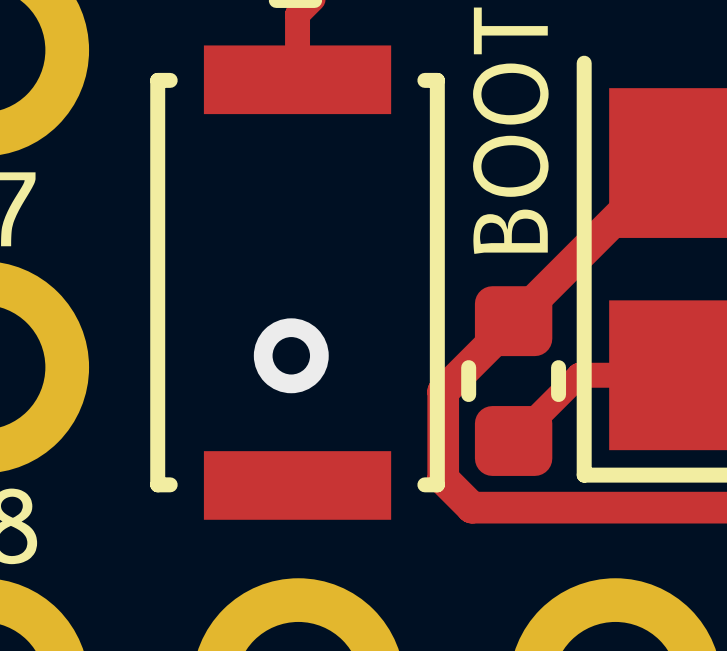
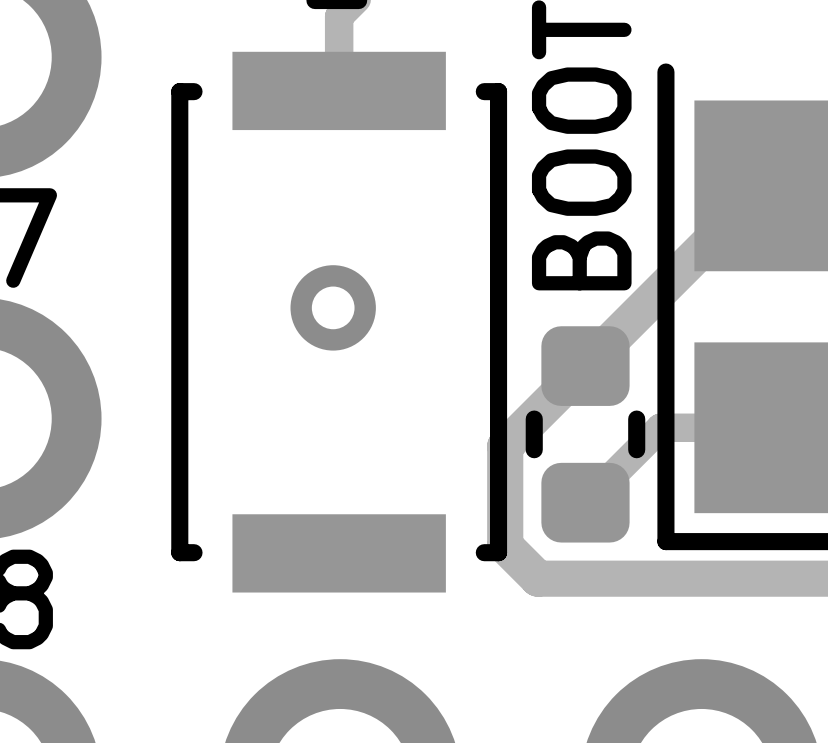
via position: (291, 355) -> (333, 307)

